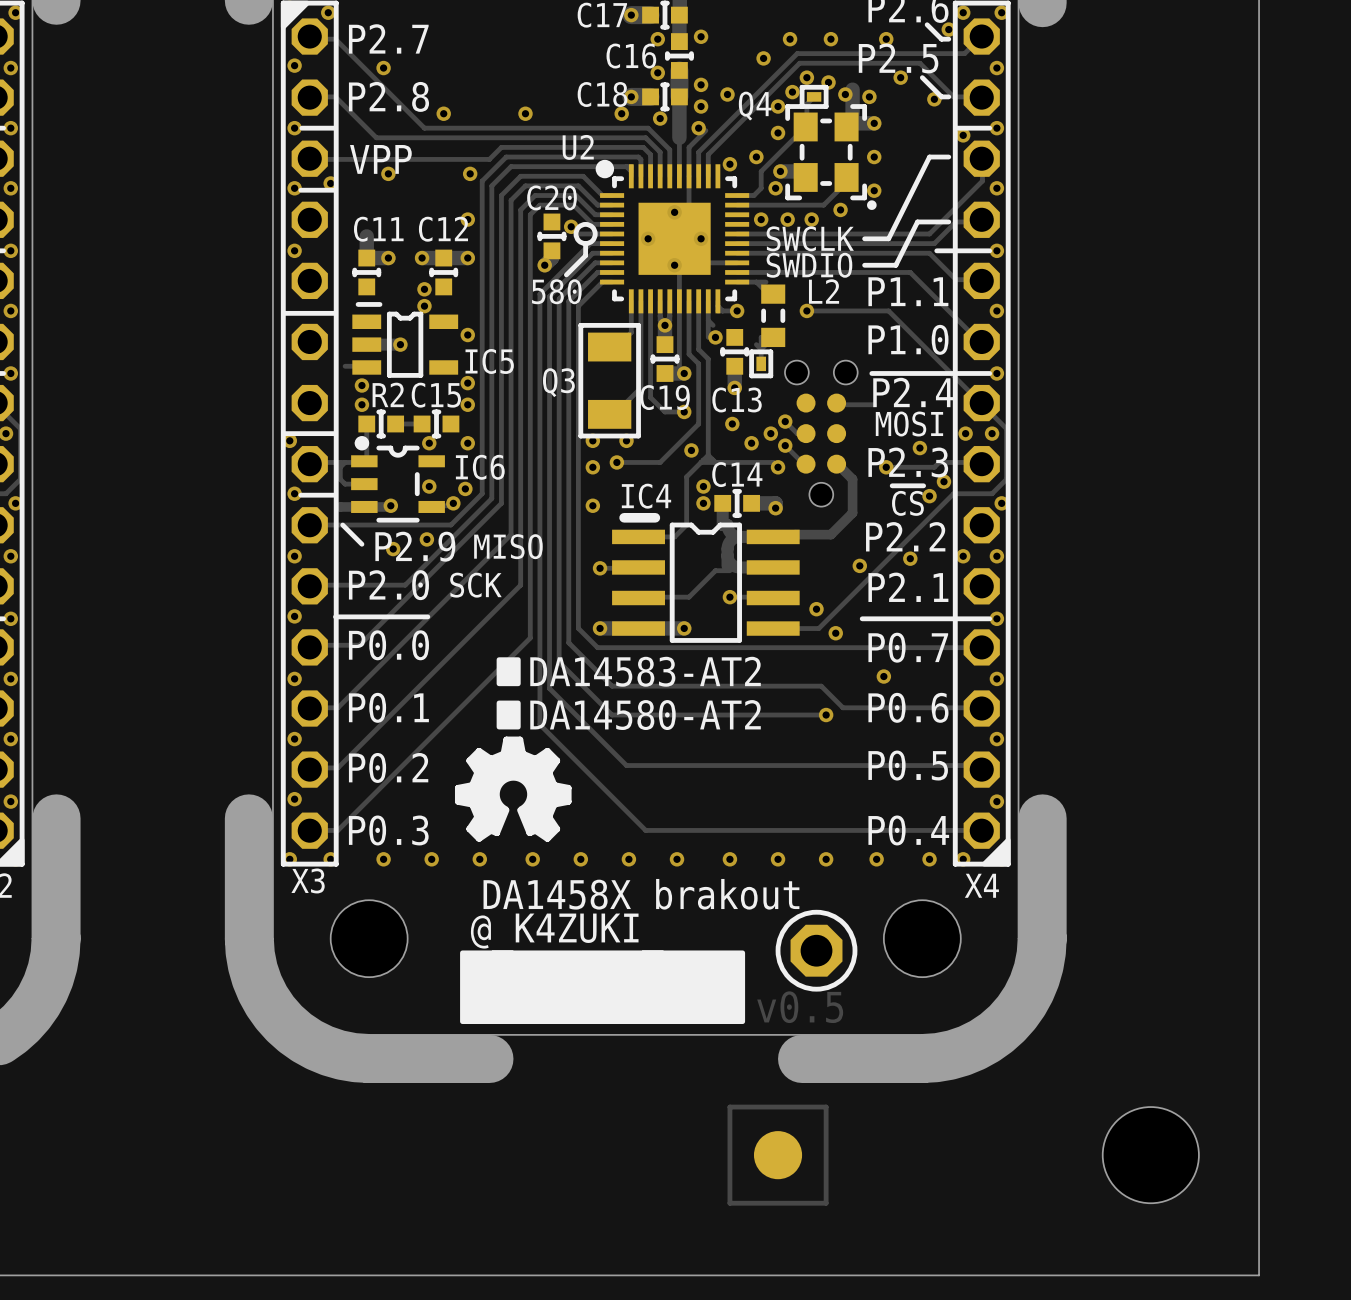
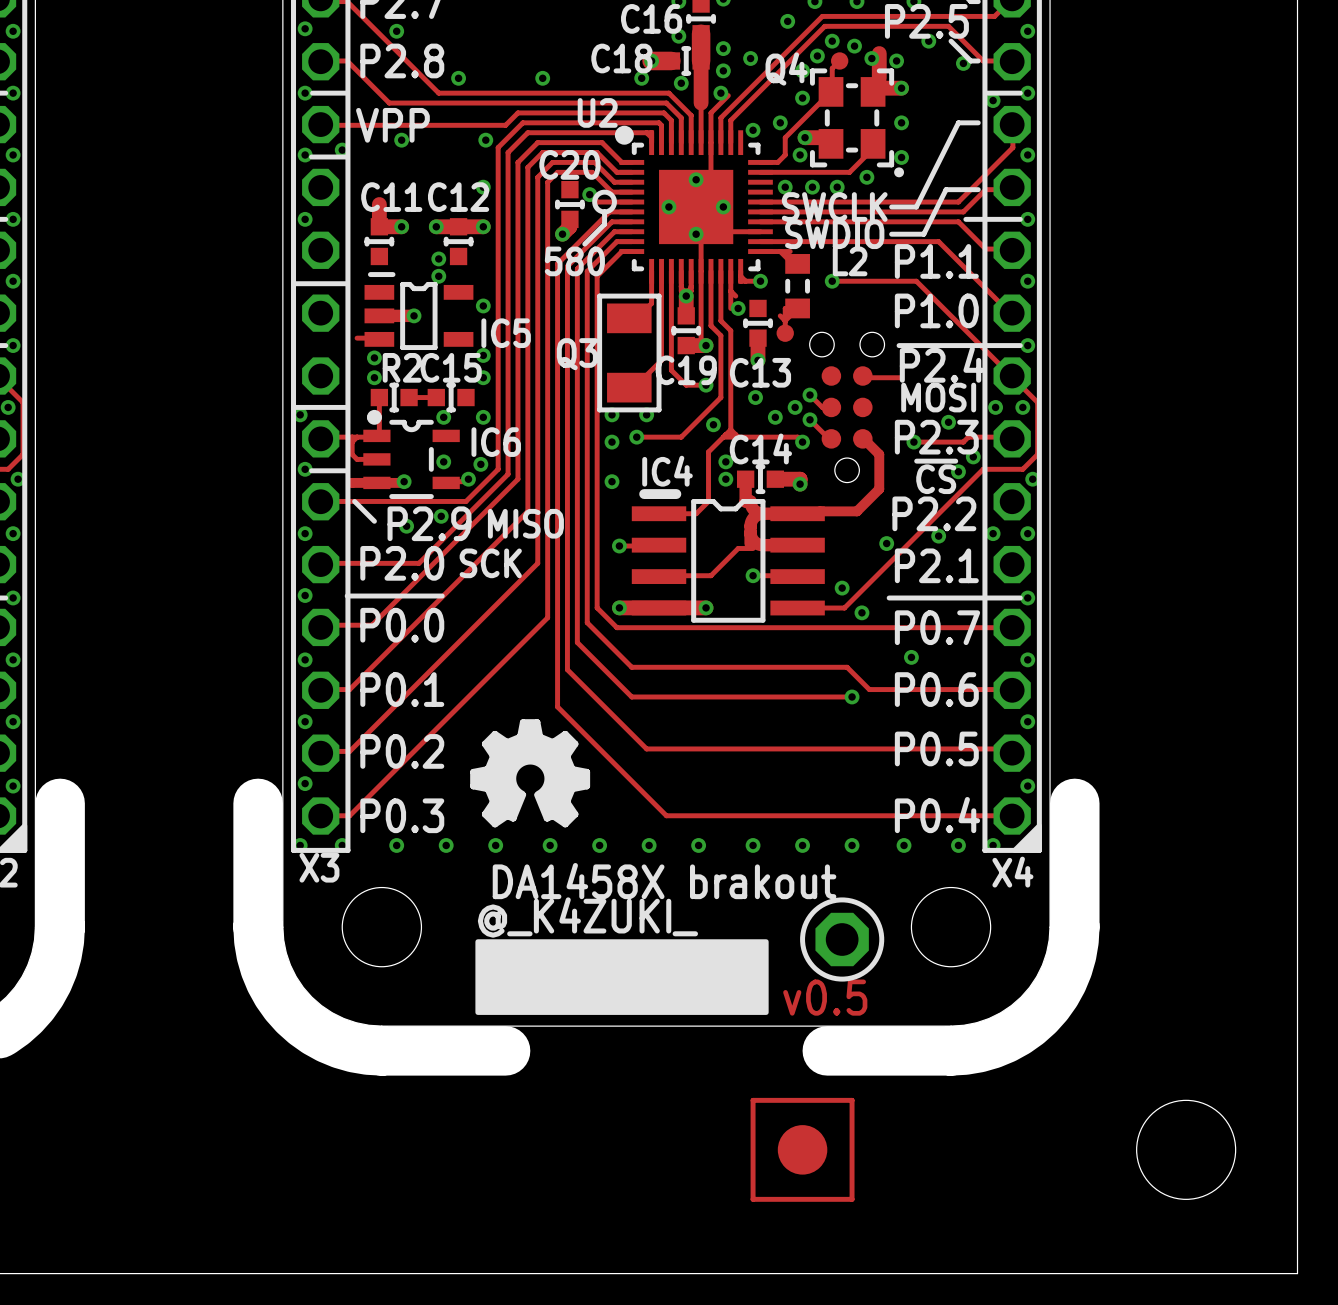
part footprint: [799, 84, 829, 109] -> [831, 52, 849, 70]
part footprint: [749, 349, 774, 379] -> [776, 324, 794, 342]
drawing: [496, 657, 521, 730] -> none
text: DA14583-AT2 (645, 671) -> none
text: DA14580-AT2 (645, 715) -> none

